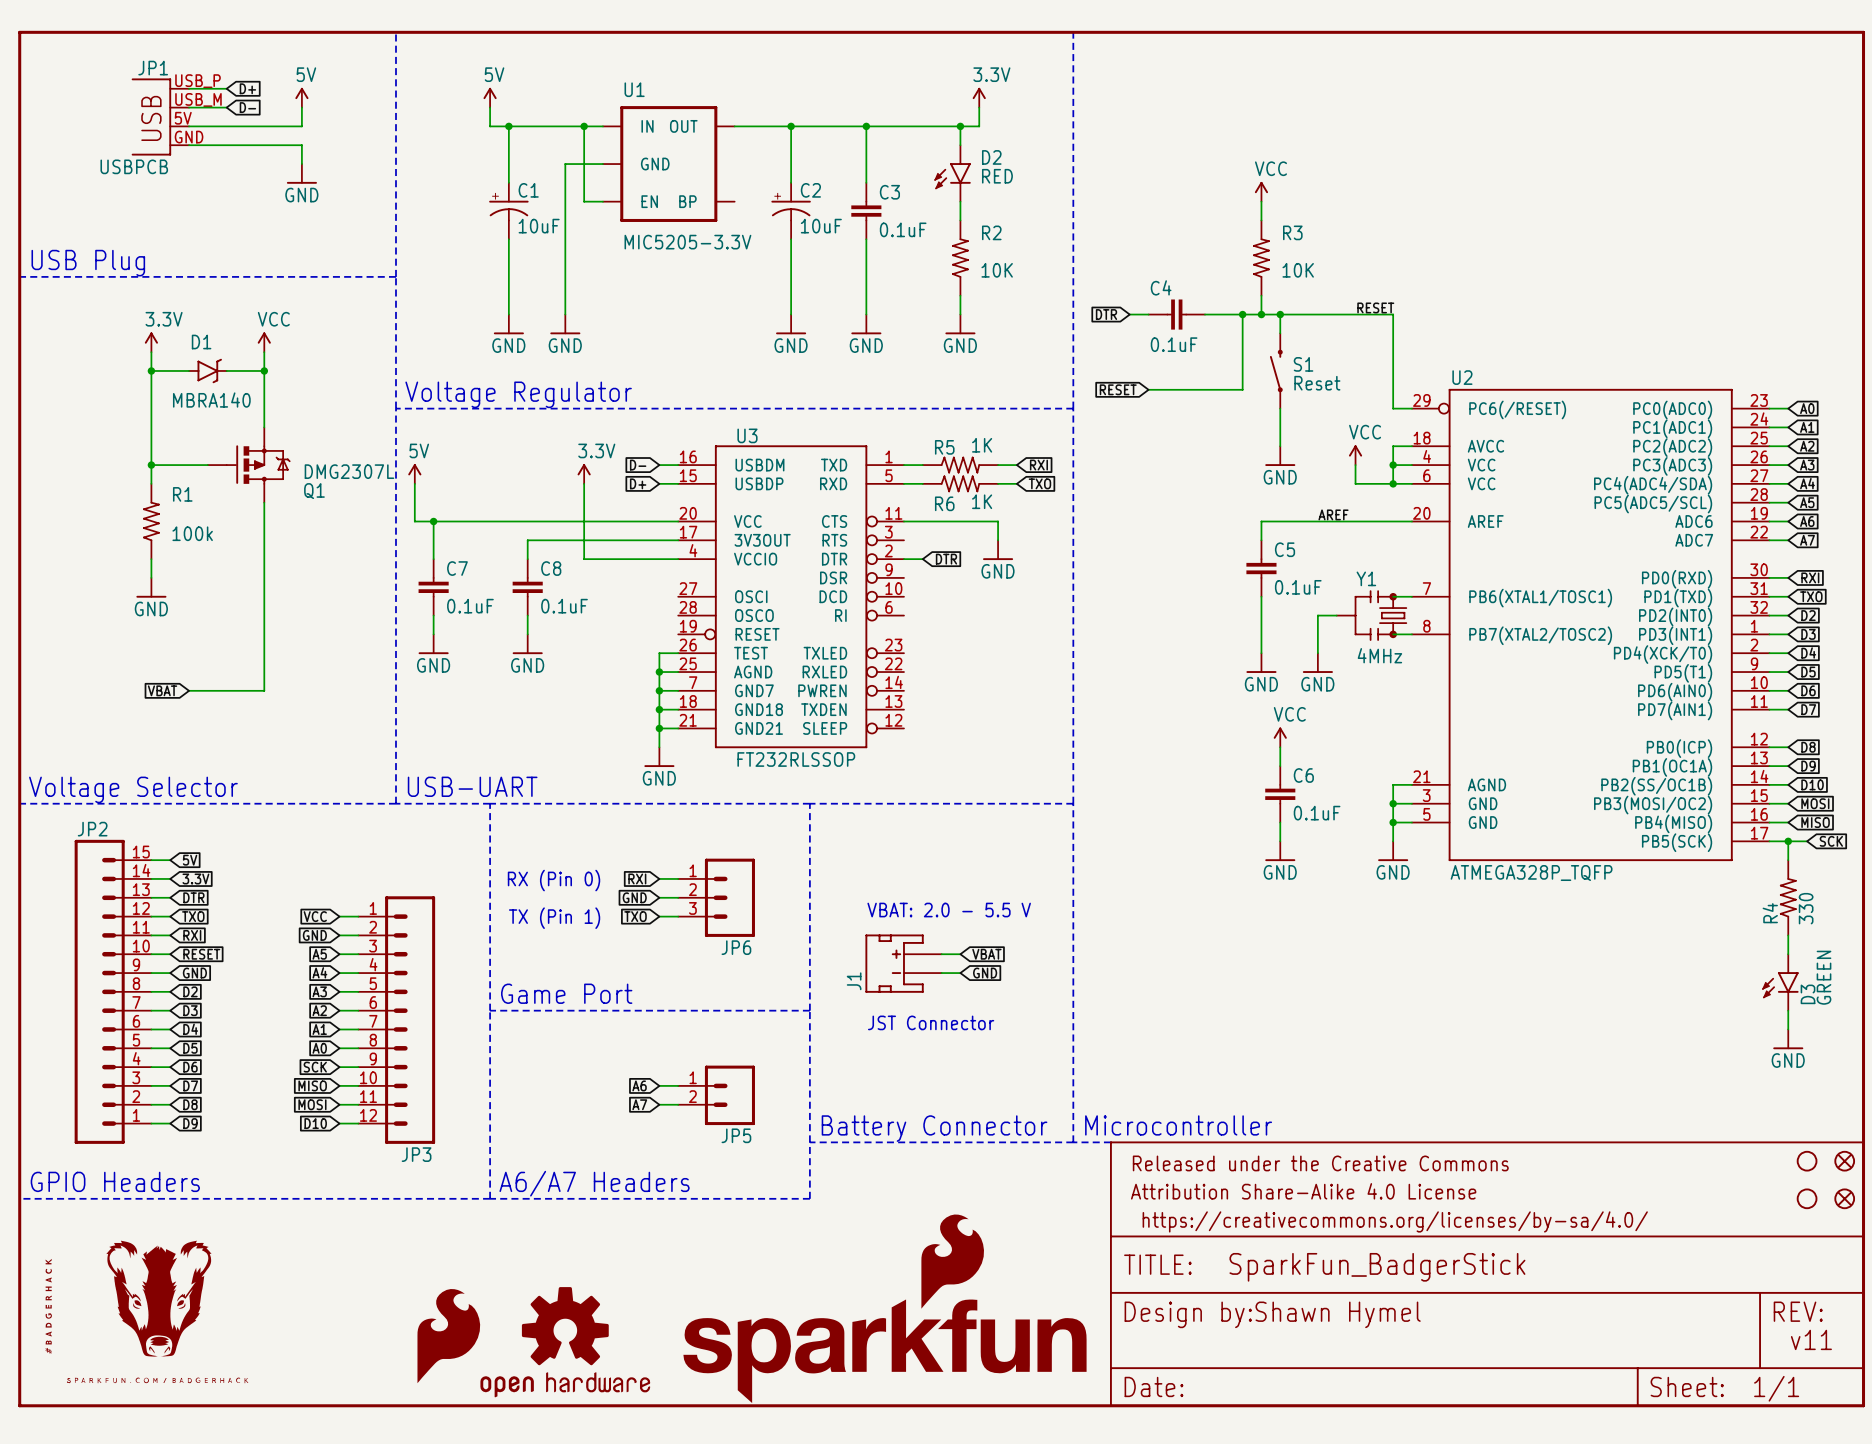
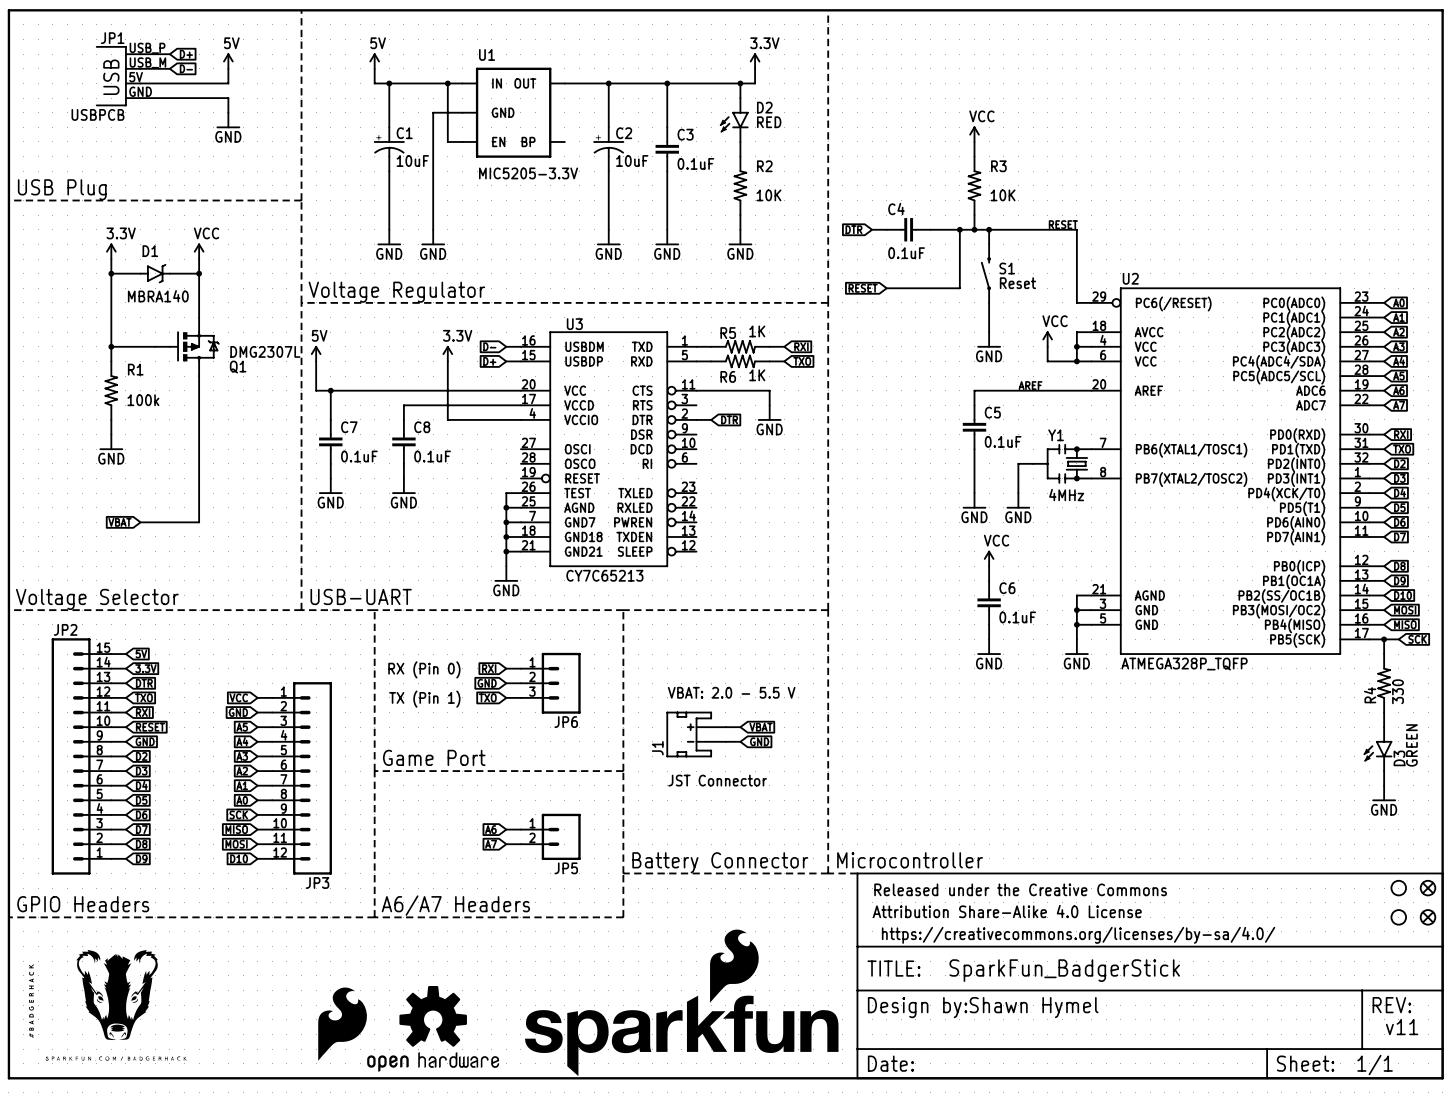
U3 pin name: 3V3OUT (762, 540) -> VCCD (579, 405)
U3 value: FT232RLSSOP (796, 759) -> CY7C65213 (604, 575)

